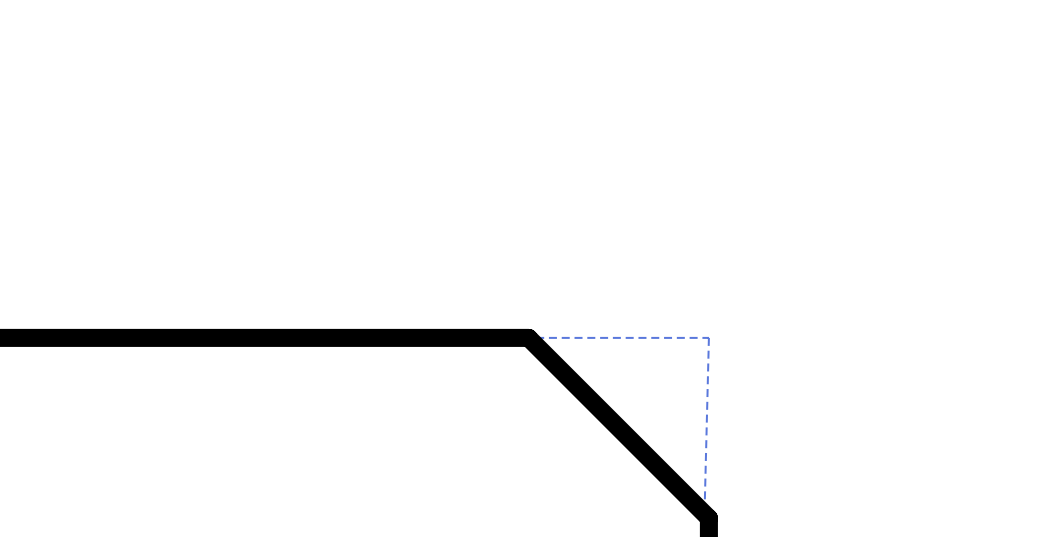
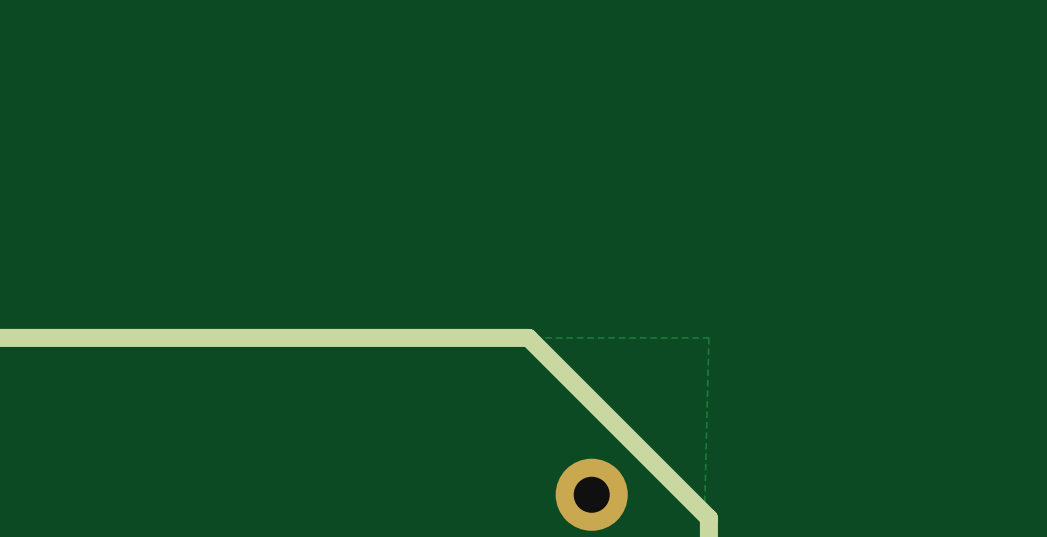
via: none -> (591, 494)

